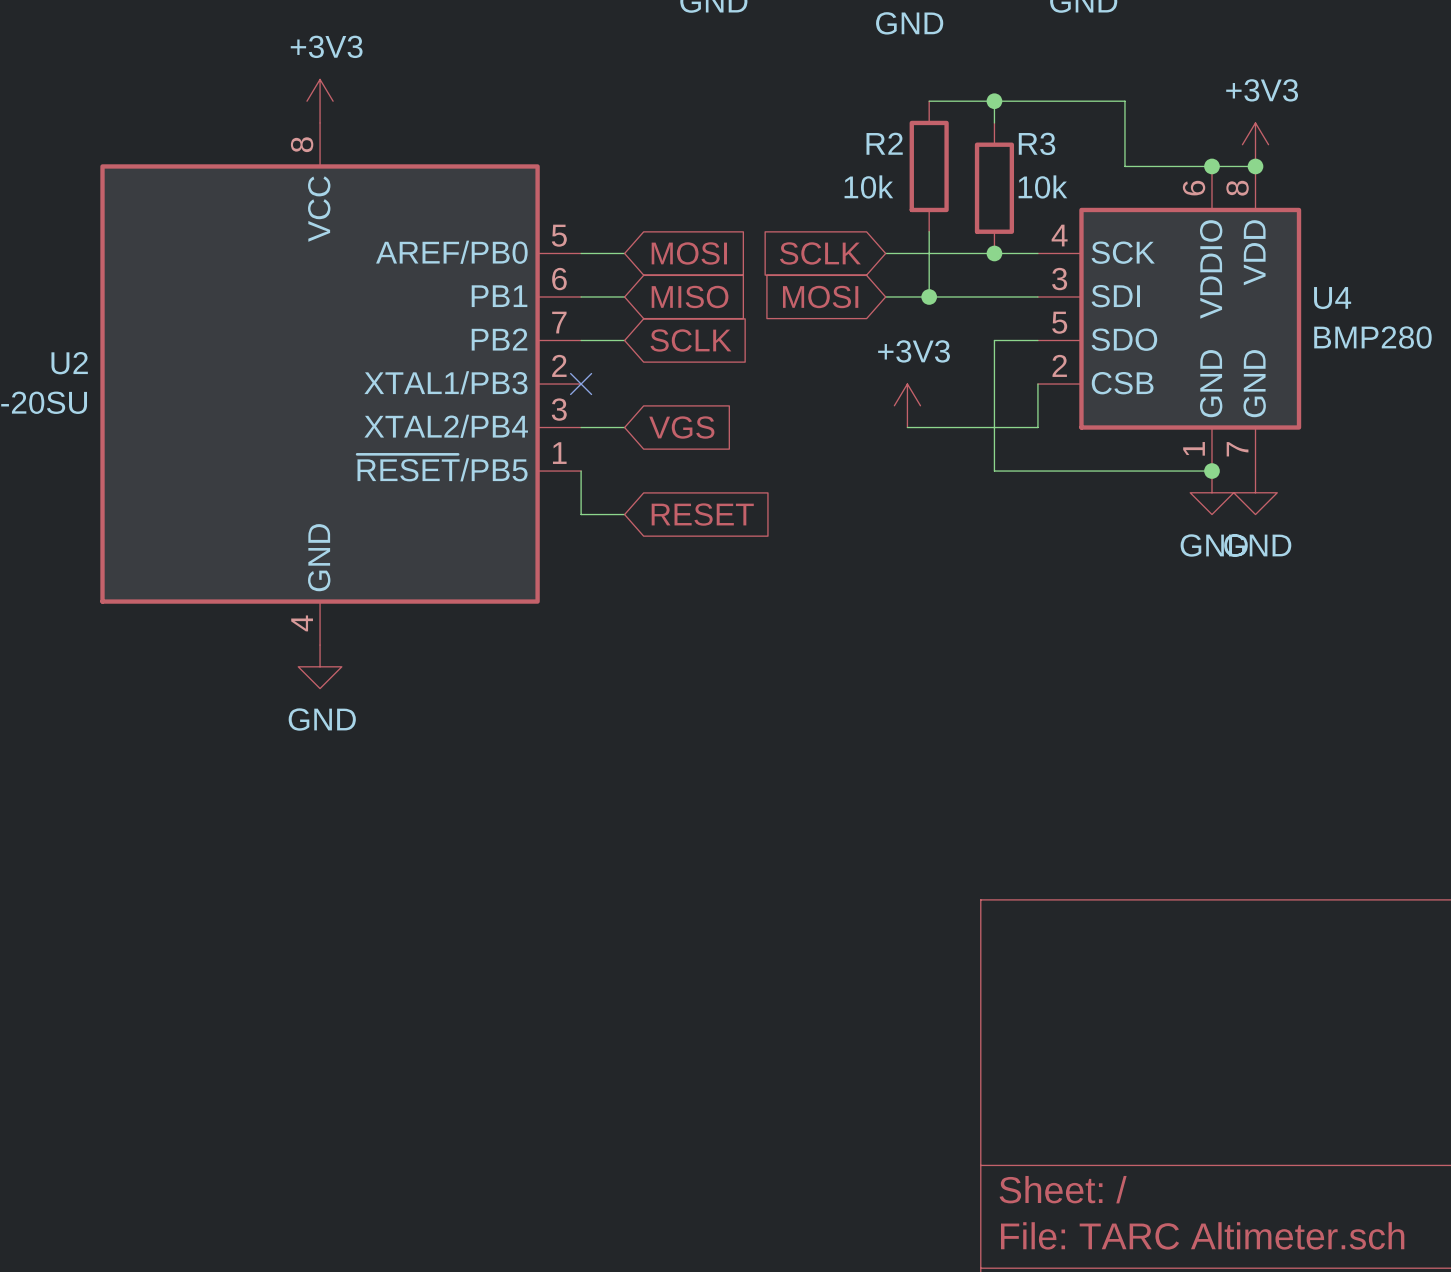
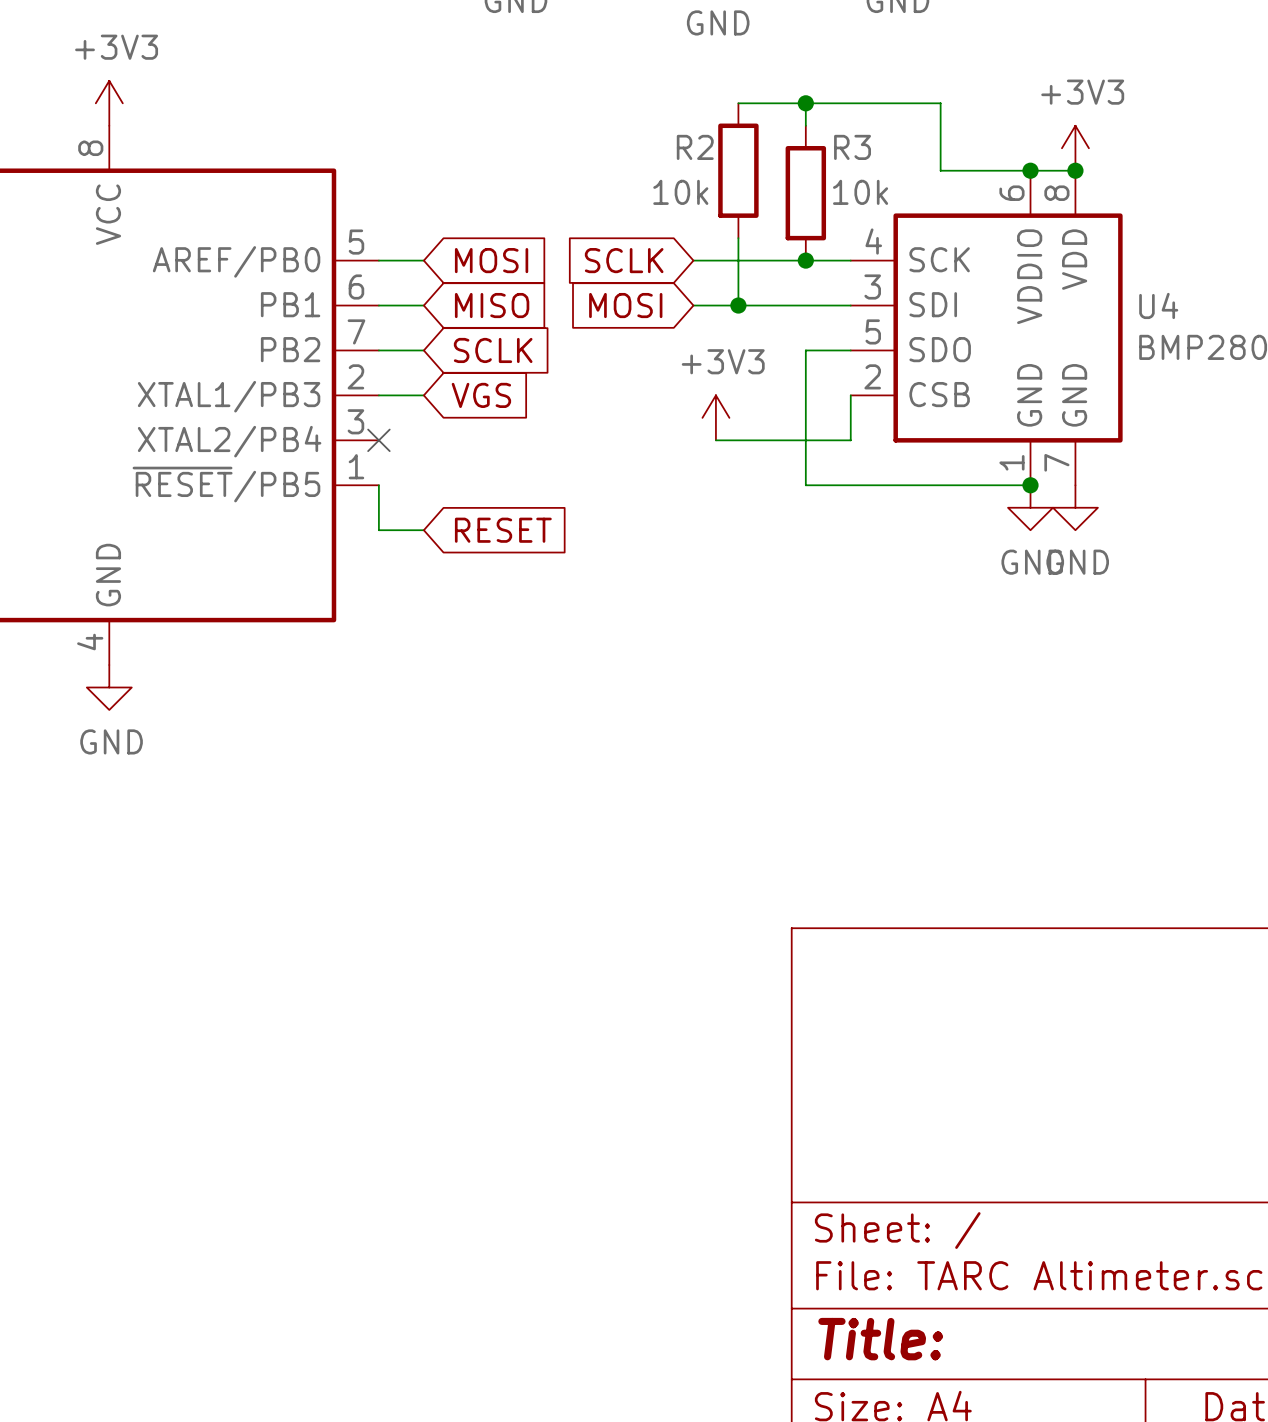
no-connect mark position: (581, 384) -> (378, 440)
wire: (581, 427) (624, 427) -> (378, 395) (423, 395)
global label position: VGS (681, 427) -> VGS (481, 395)

